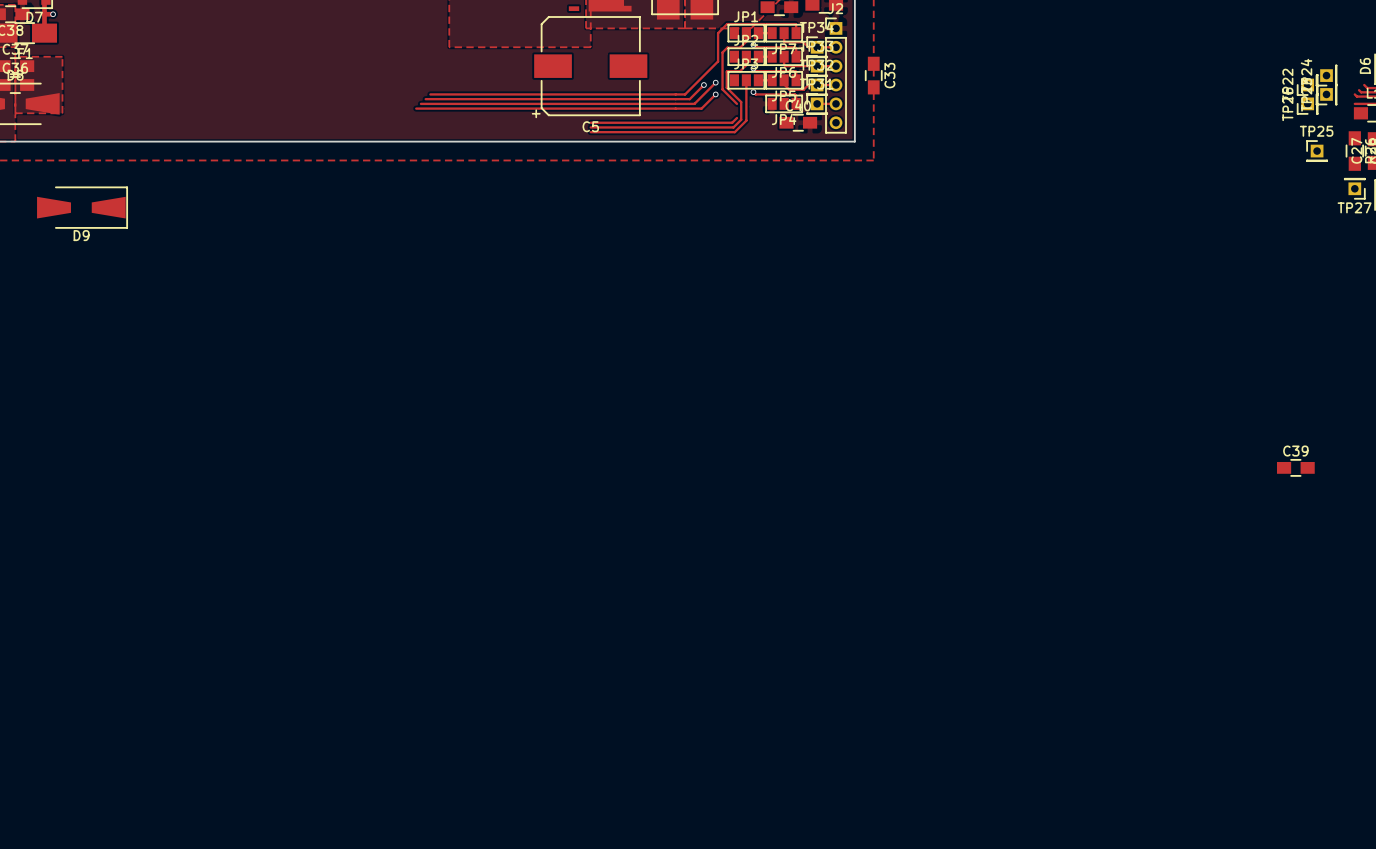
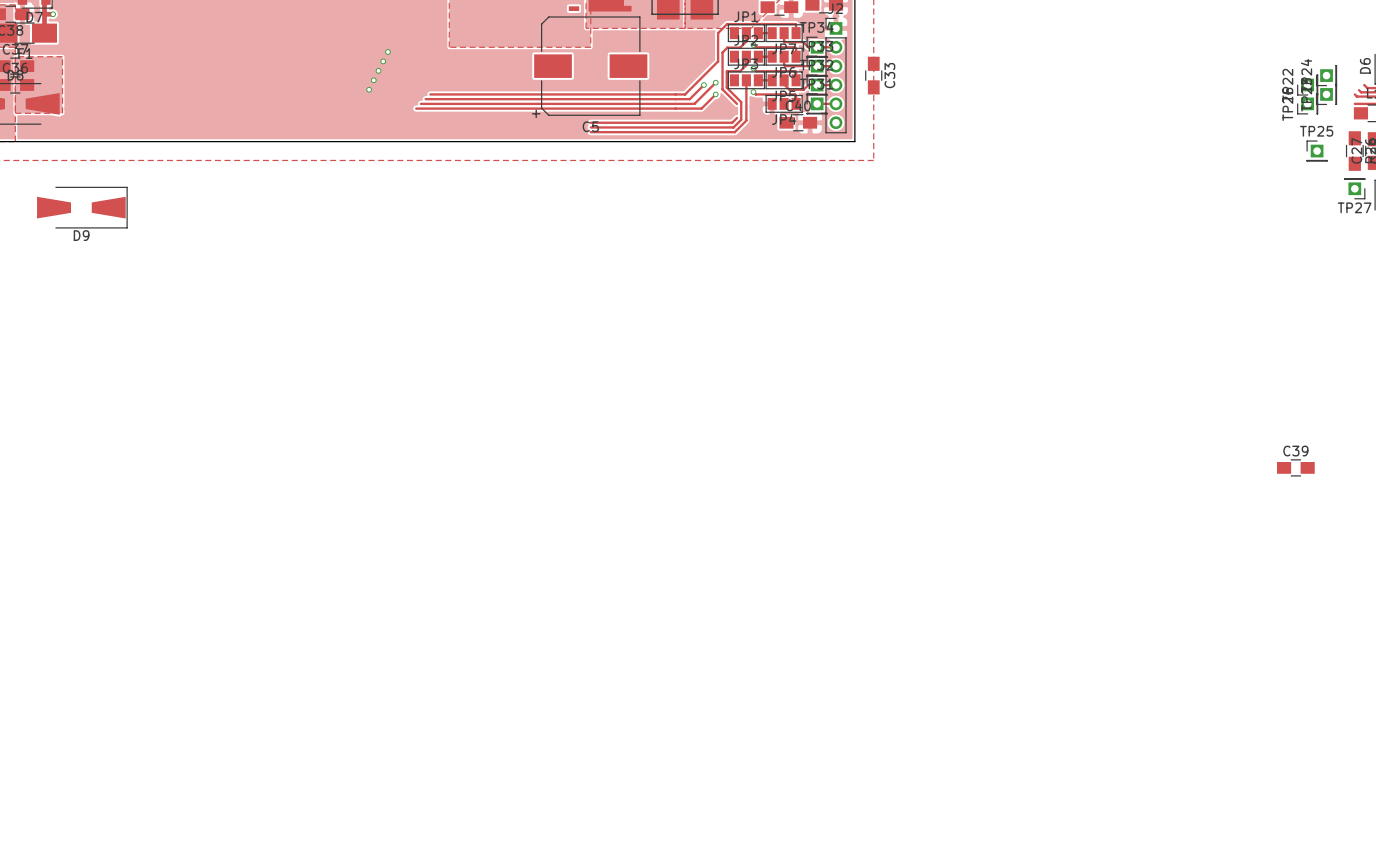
via: none -> (387, 52)
via: none -> (383, 61)
via: none -> (378, 70)
via: none -> (373, 80)
via: none -> (369, 89)

